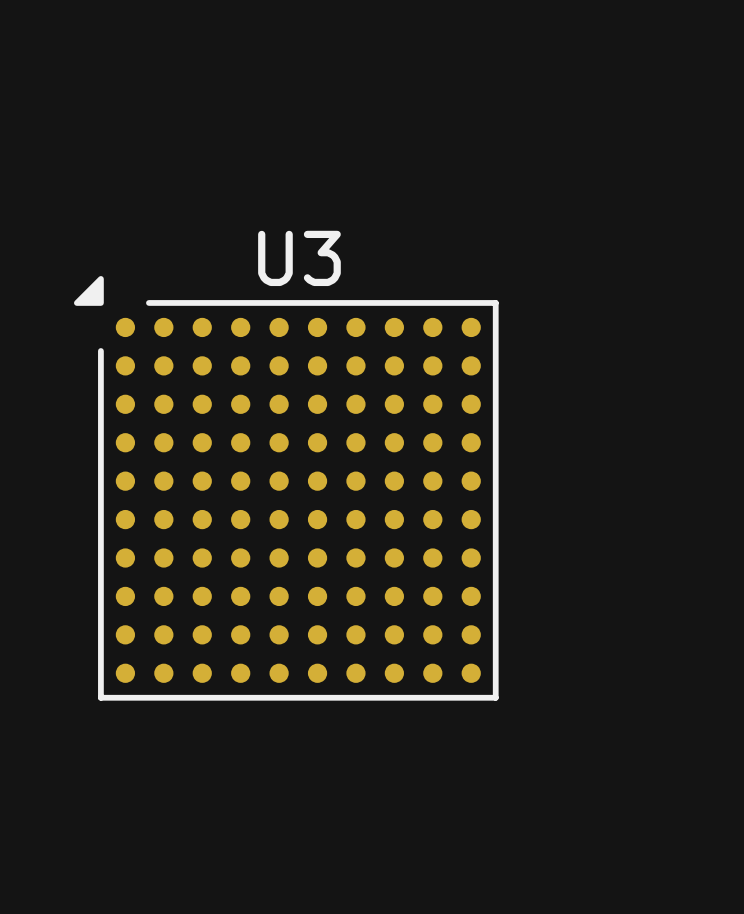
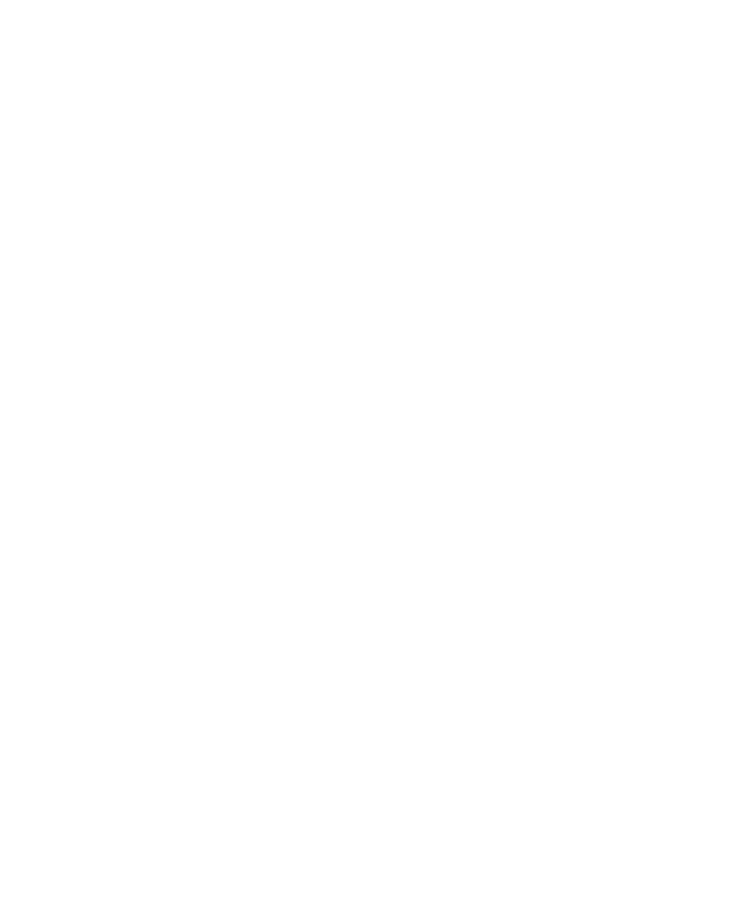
U3: (286, 488) -> none

